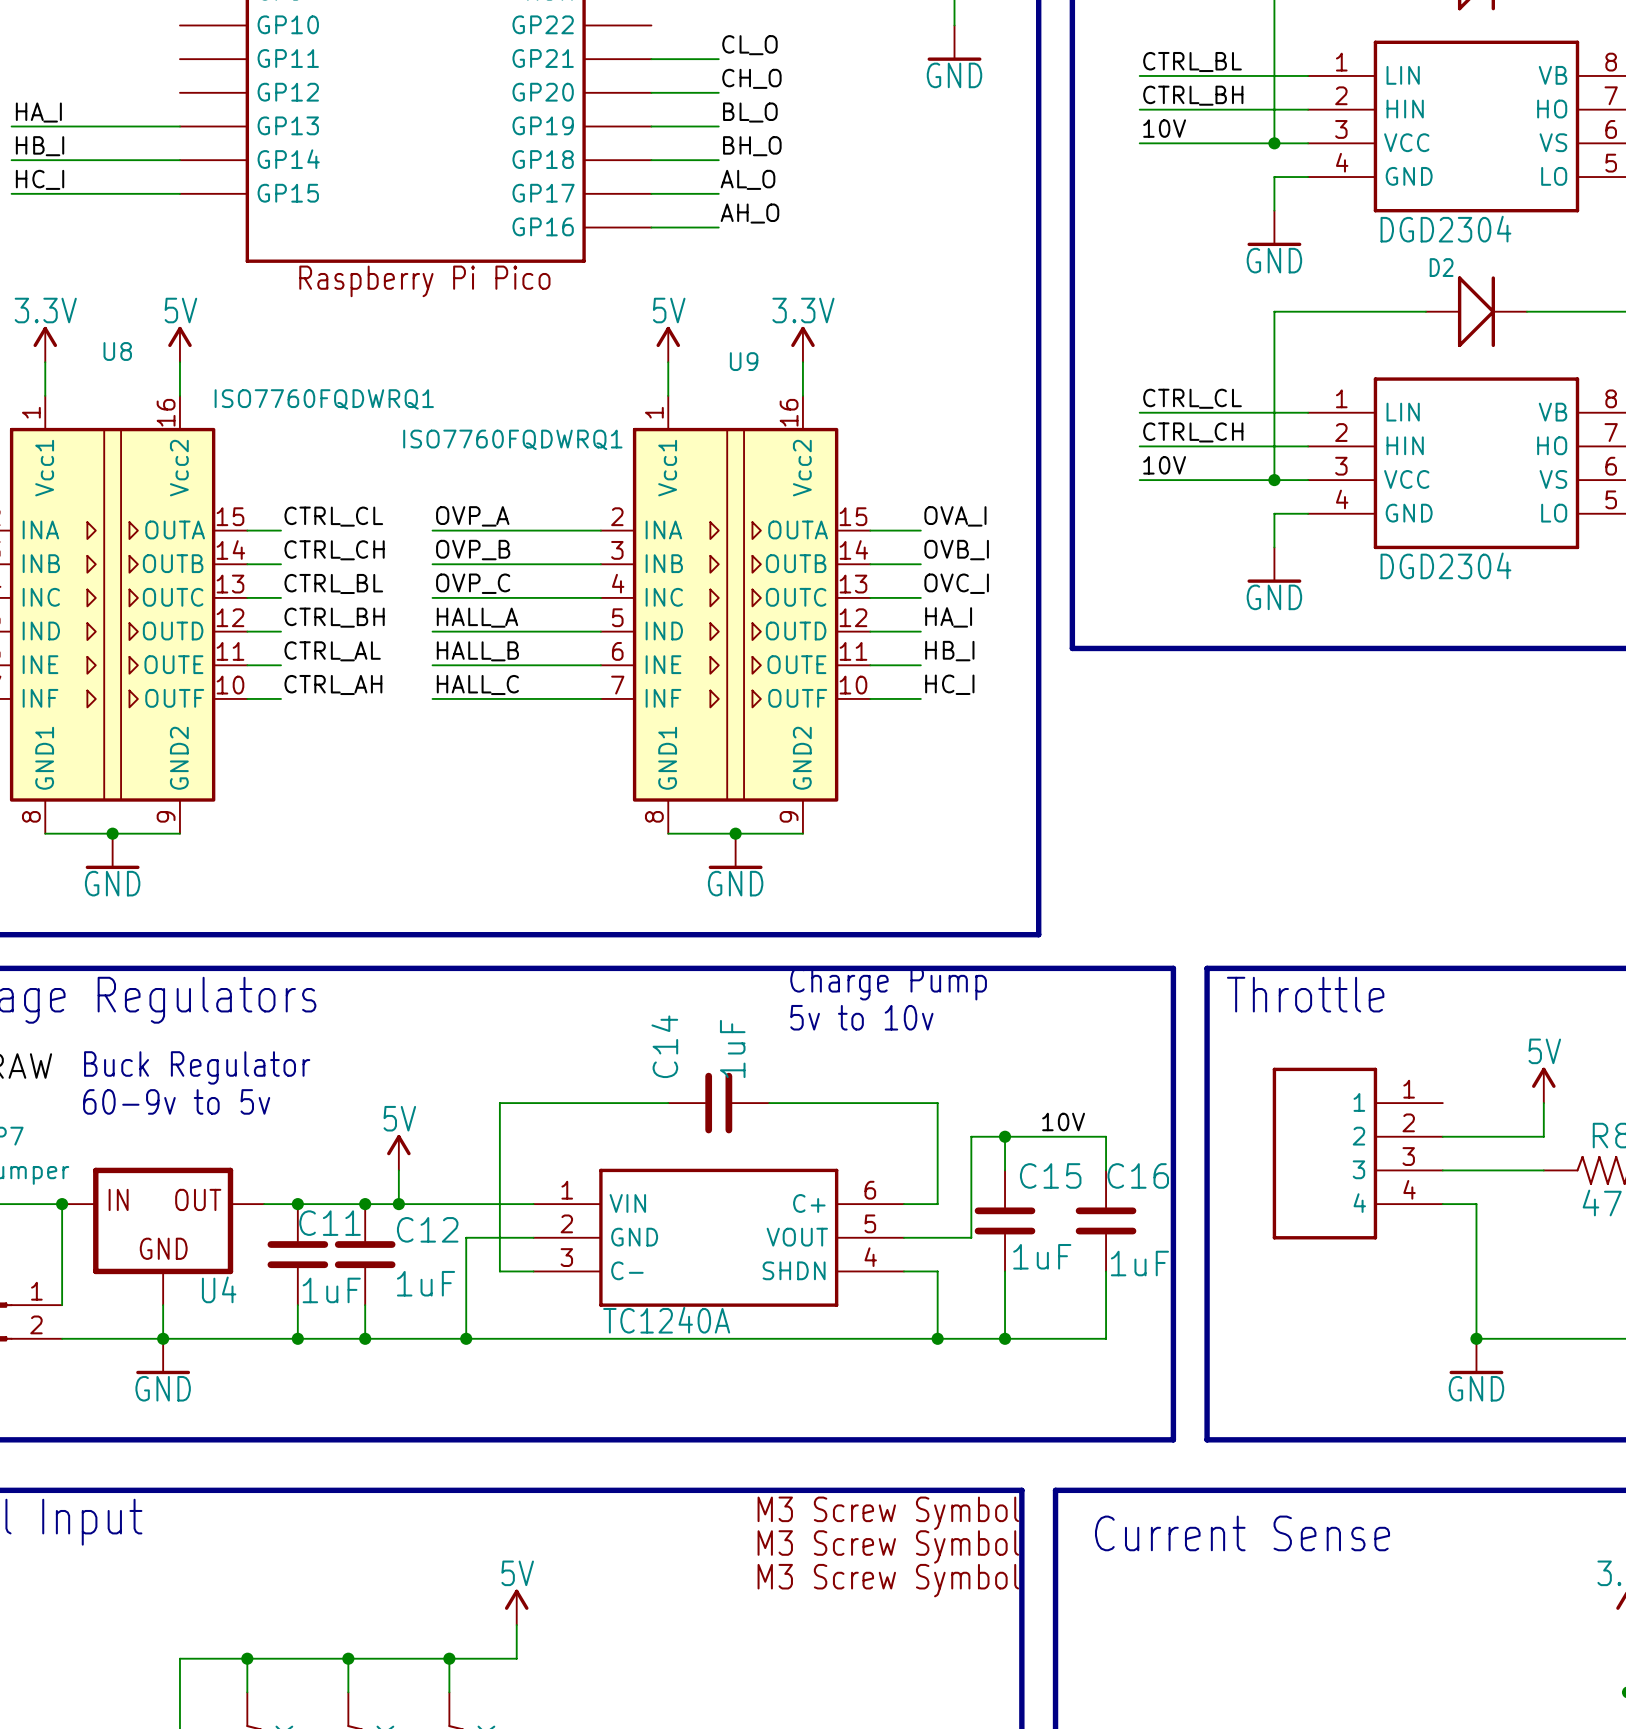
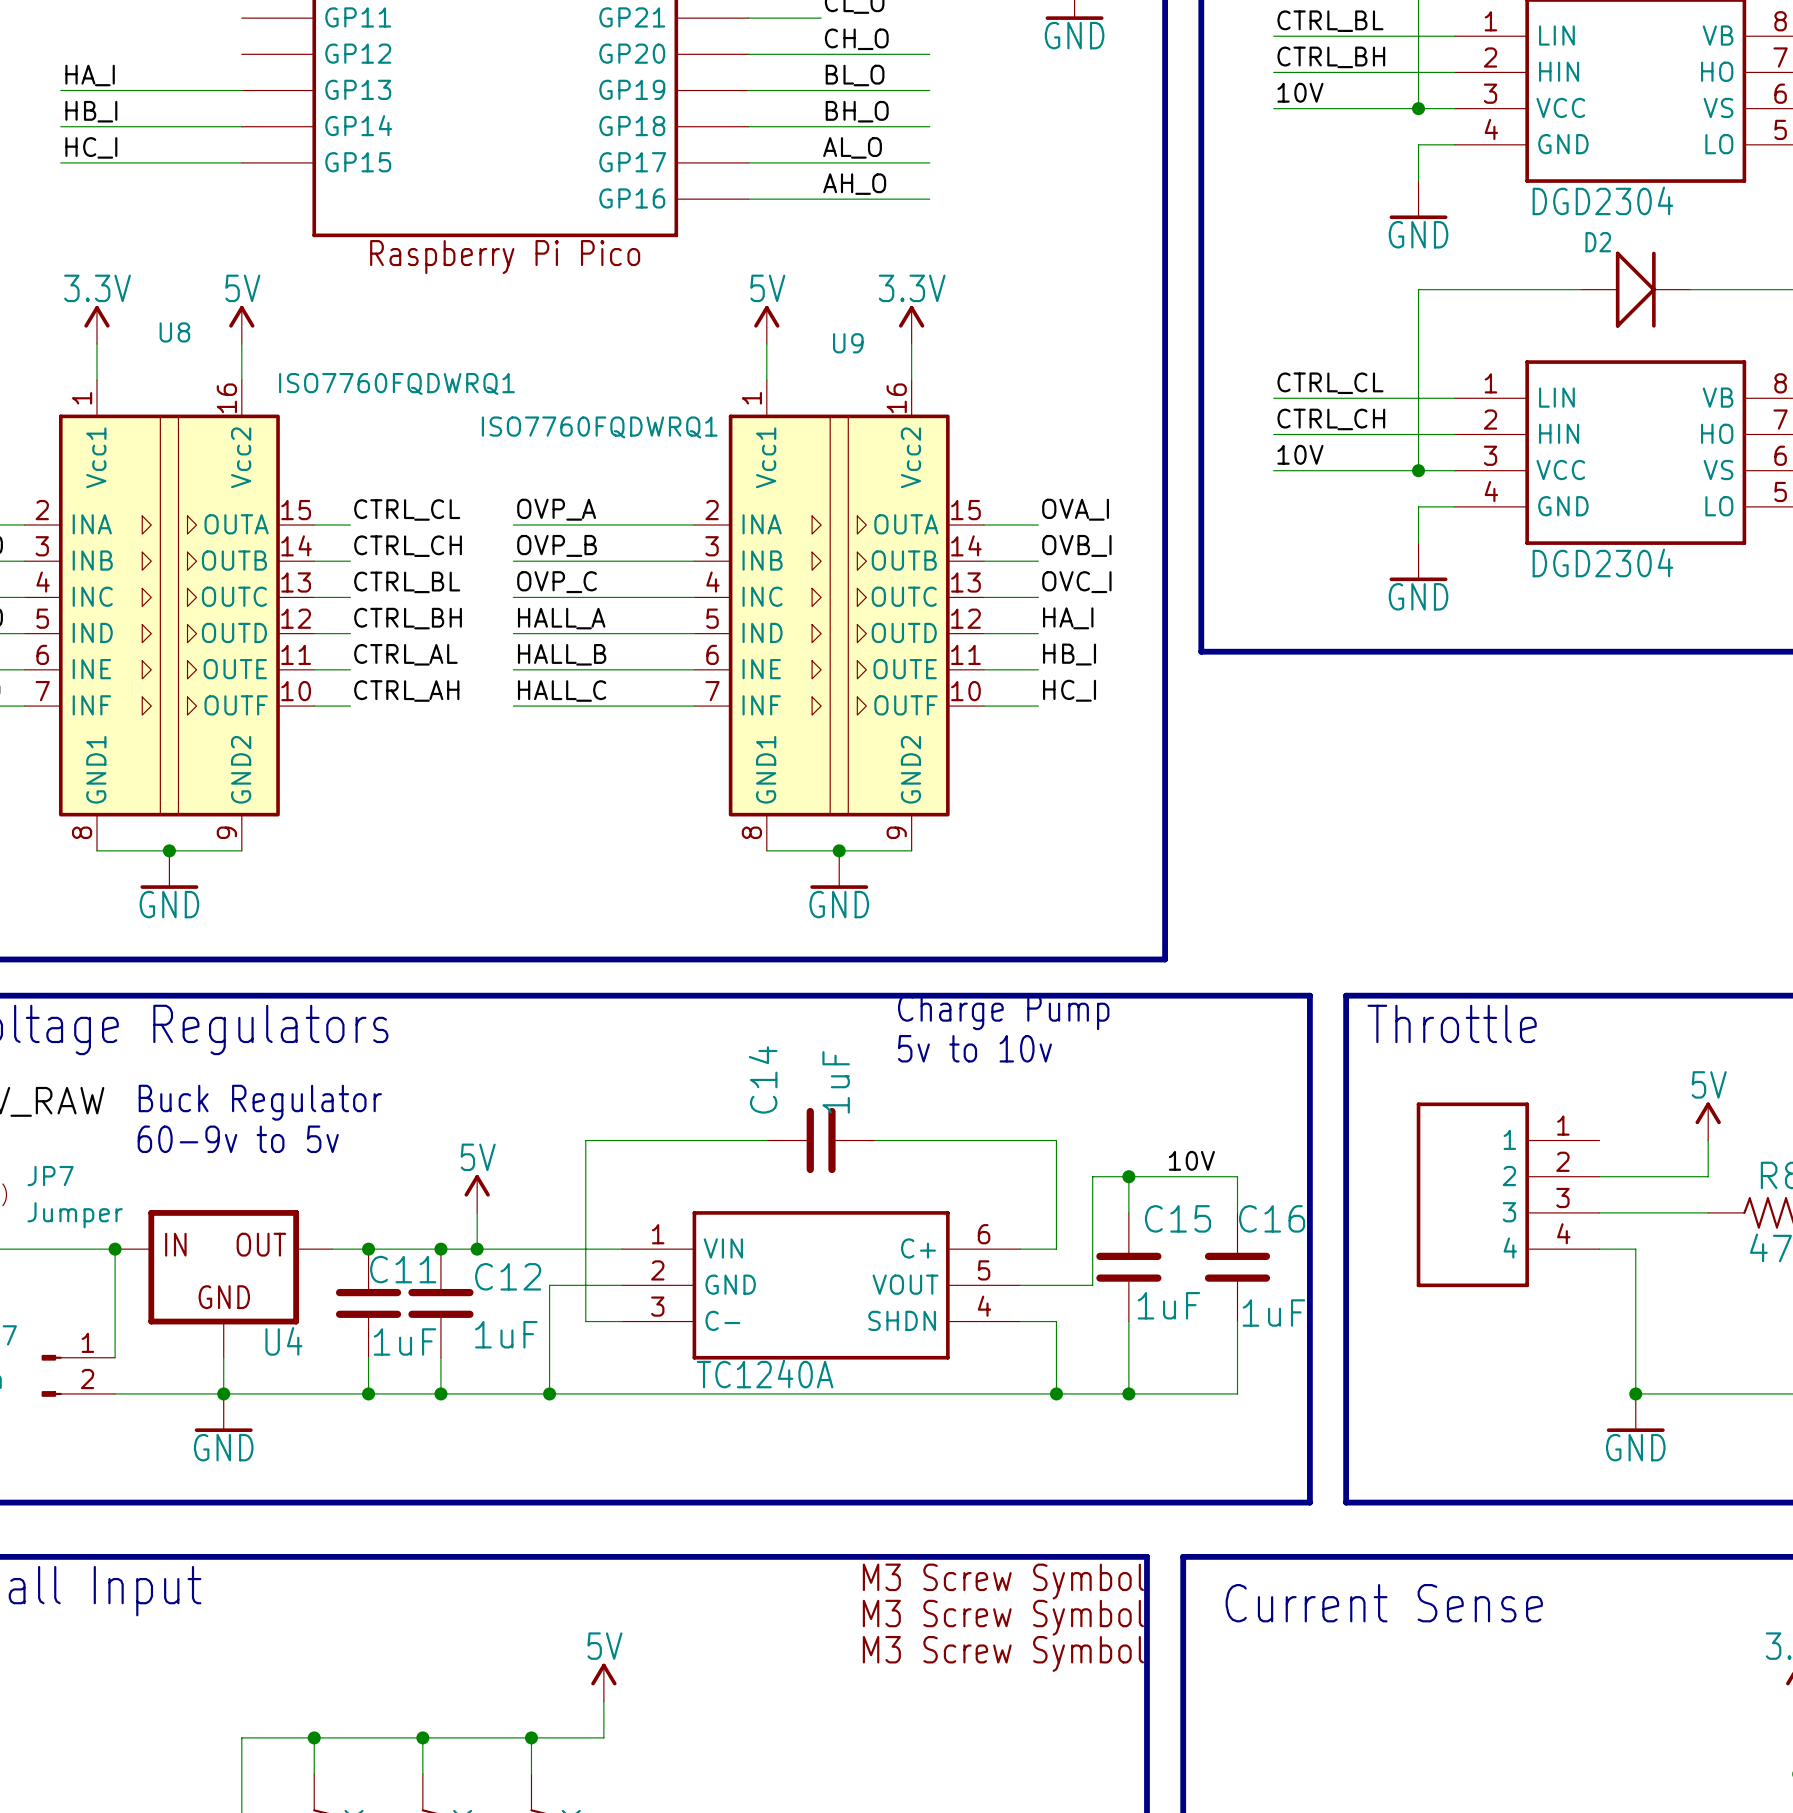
wire: none -> (821, 54) (929, 54)
wire: none -> (821, 90) (929, 90)
wire: none -> (821, 126) (929, 126)
wire: none -> (821, 162) (929, 162)
wire: none -> (821, 199) (929, 199)

